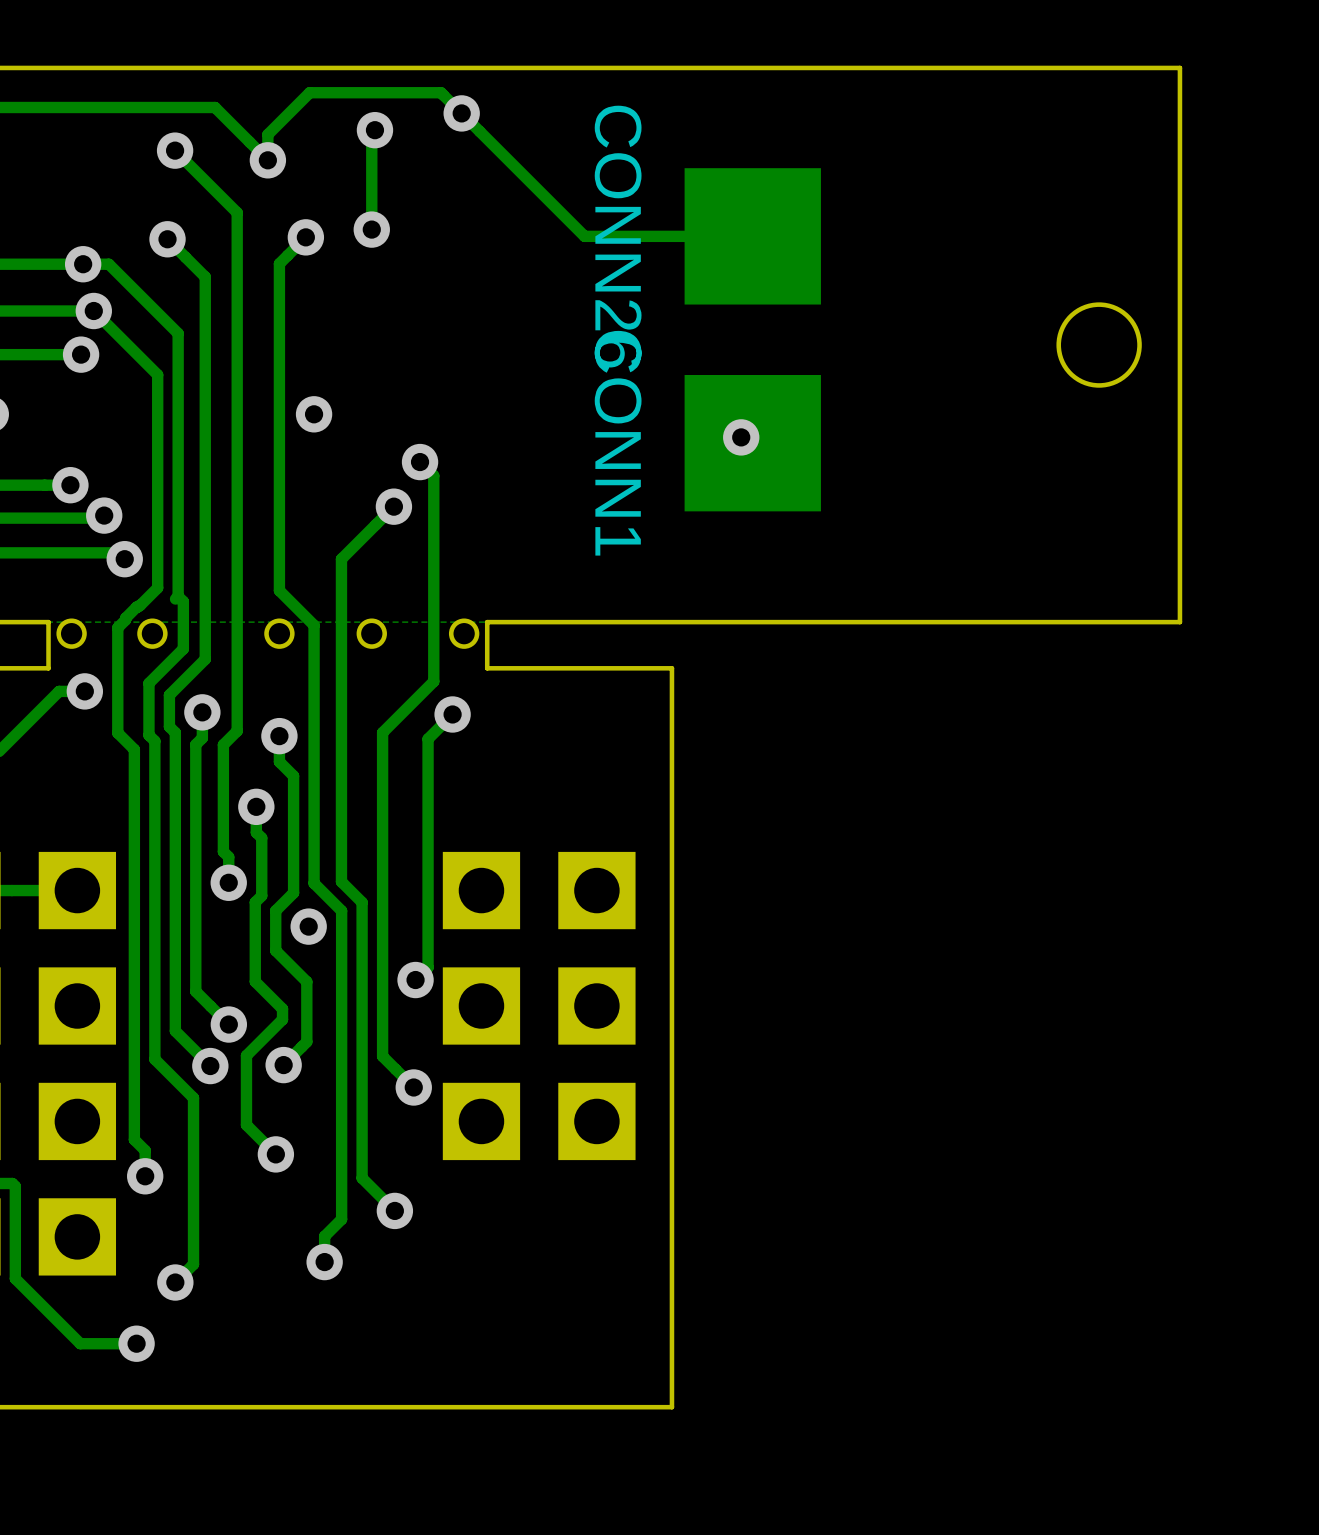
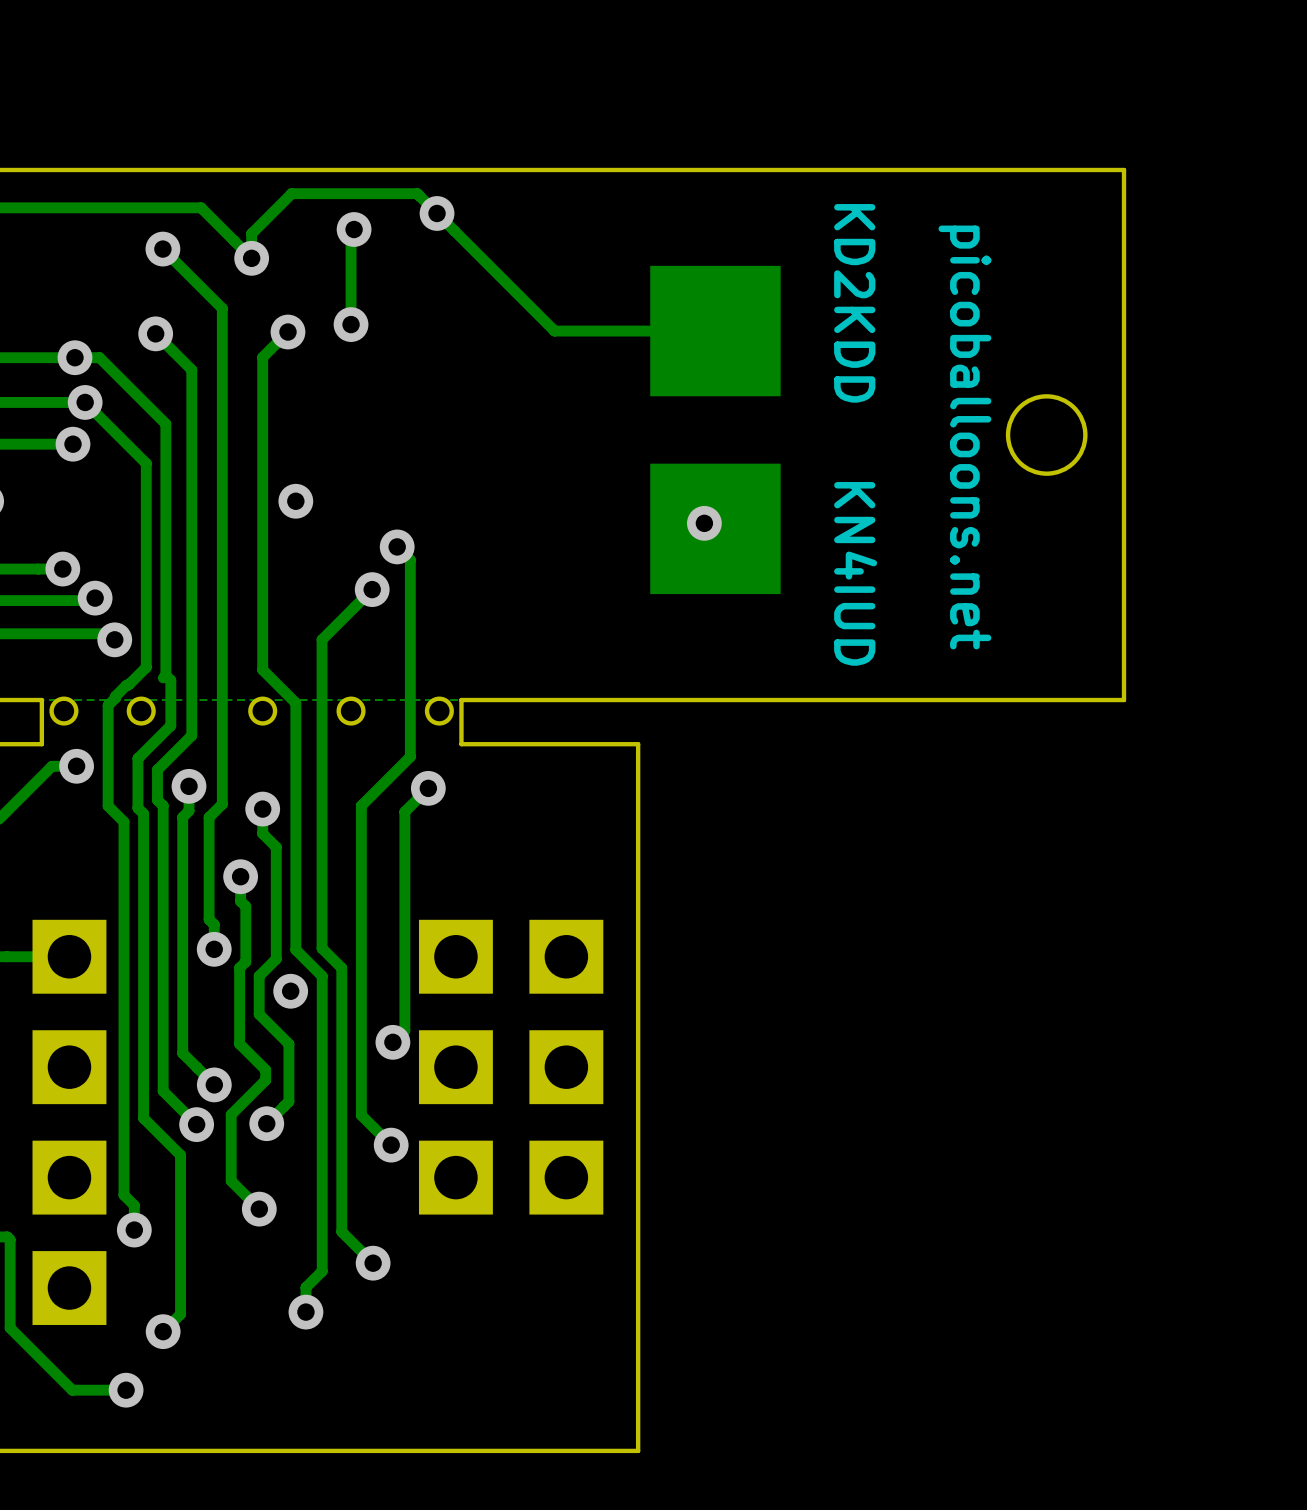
text: none -> KD2KDD (854, 303)
CONN26 name: CONN26 (618, 236) -> none
text: none -> picoballoons.net (964, 437)
CONN1 name: CONN1 (618, 443) -> none
text: none -> KN4IUD (855, 573)

